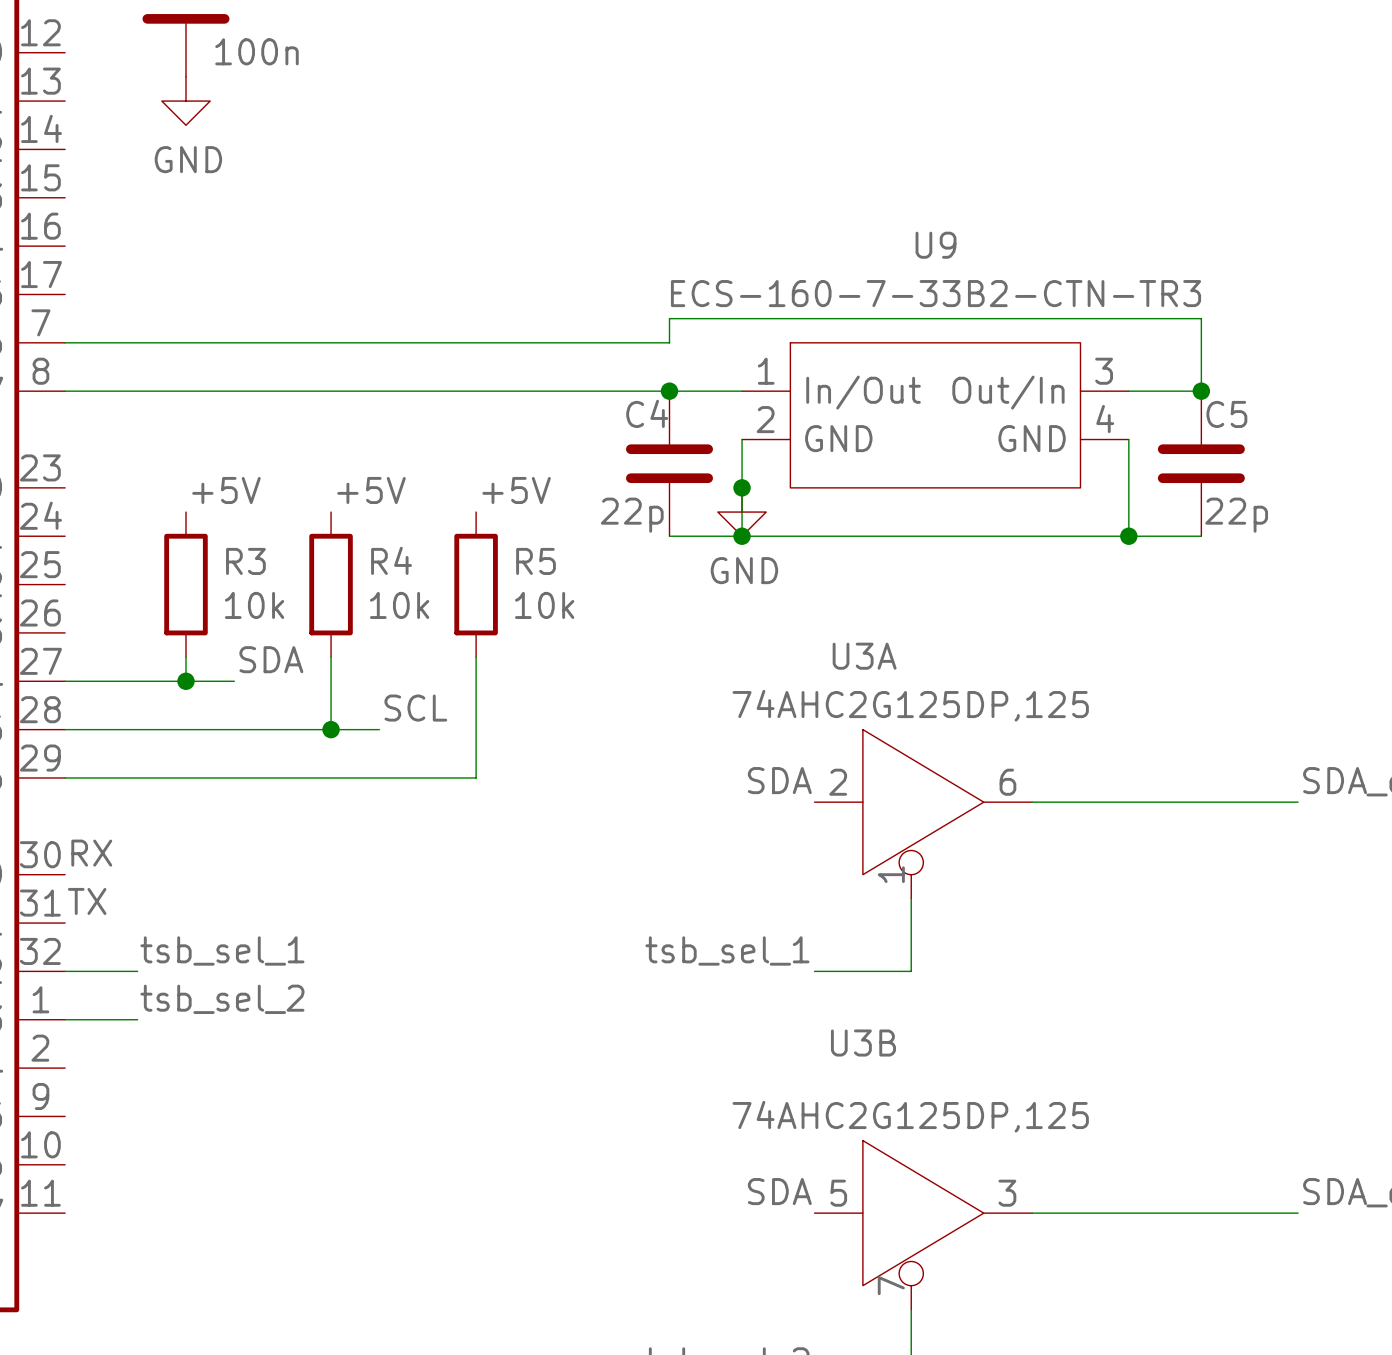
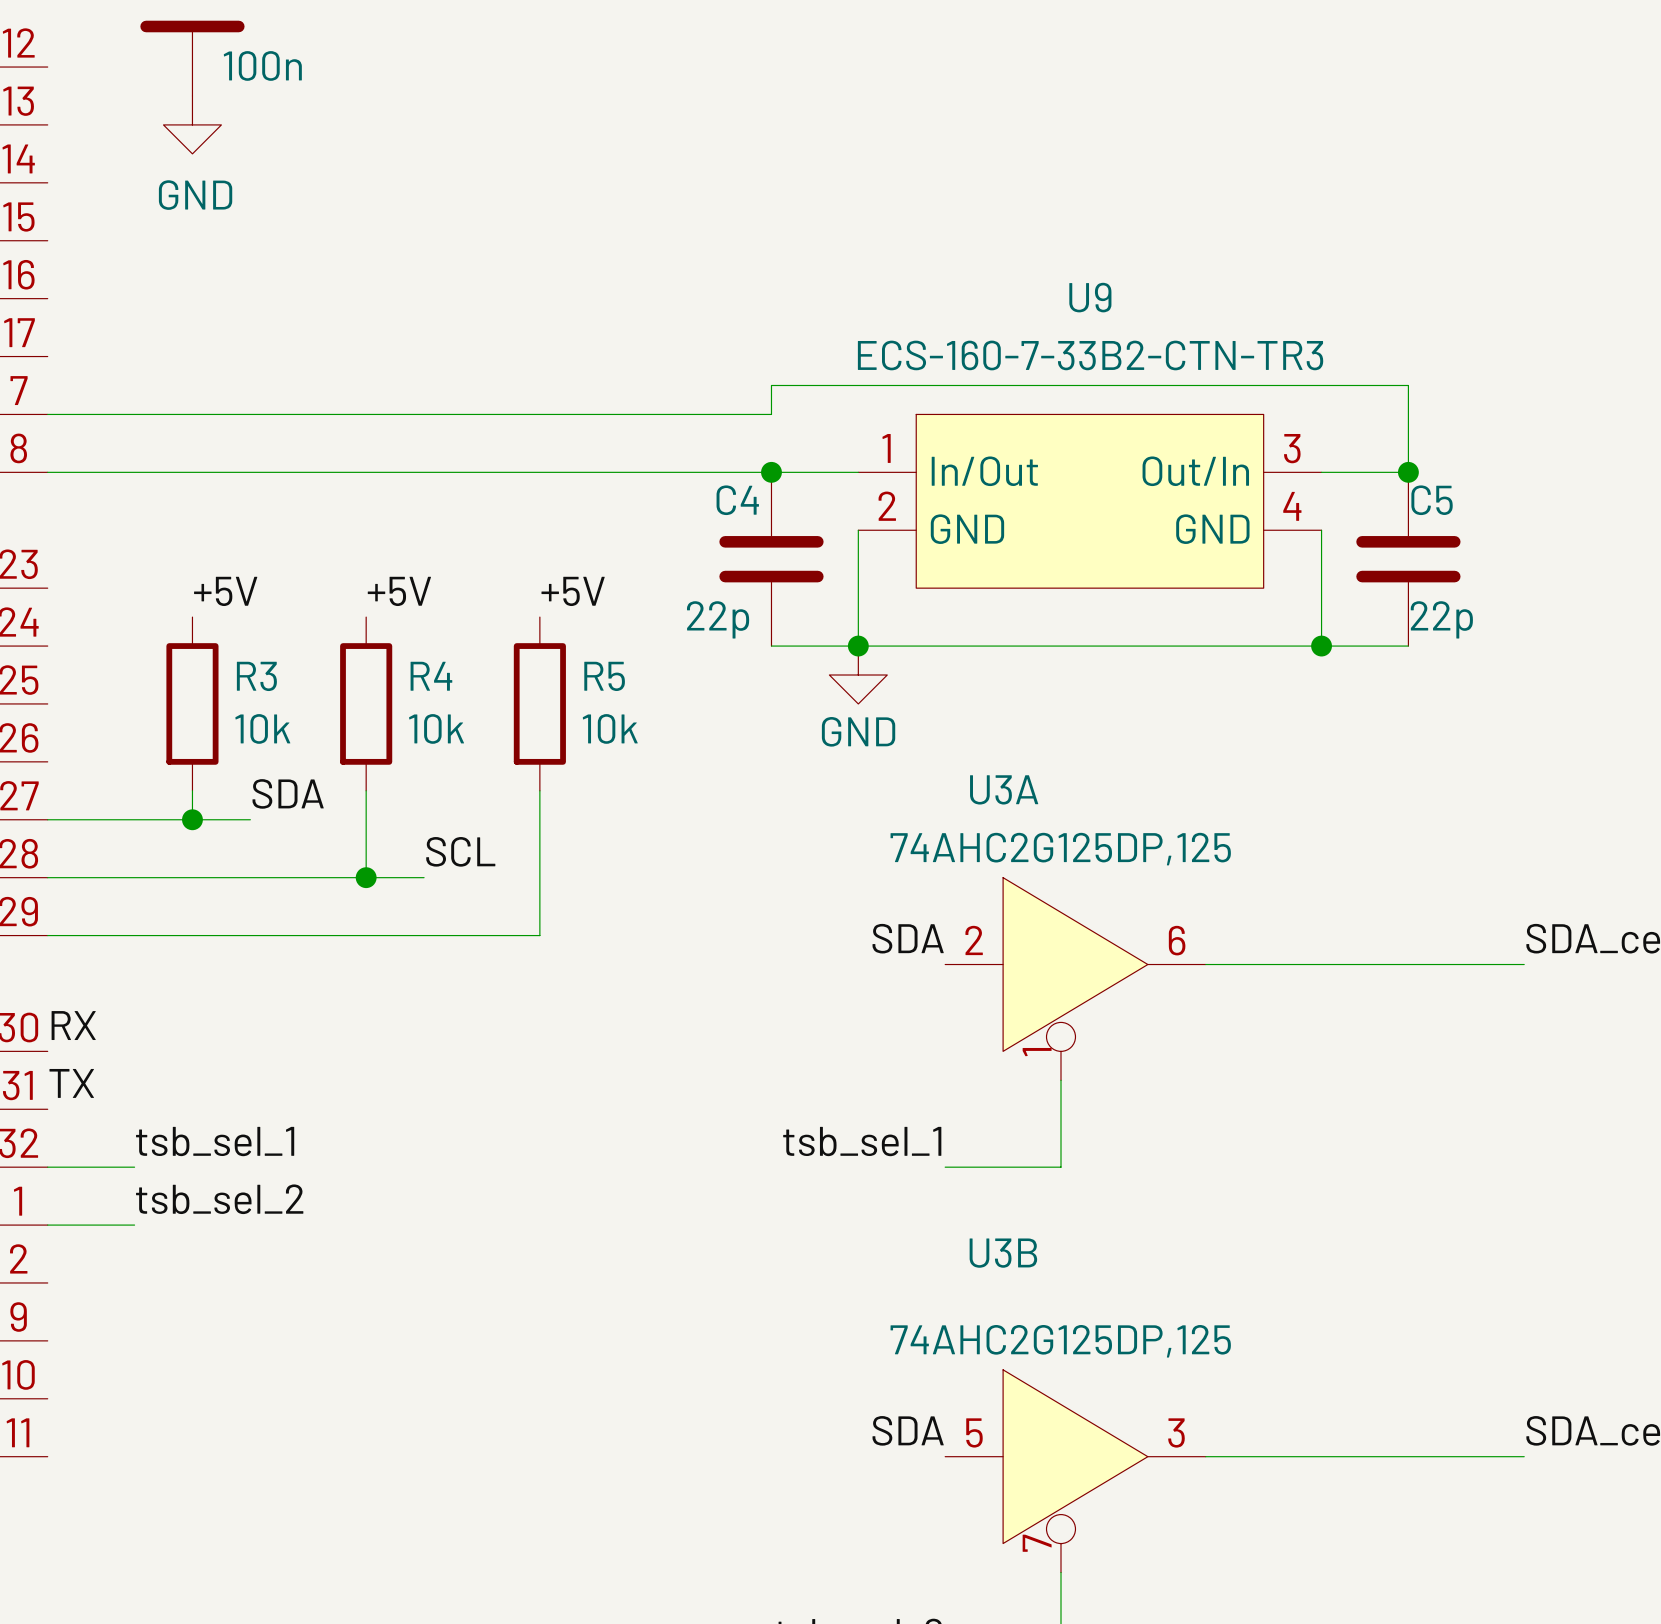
junction: (742, 487) -> none
power symbol position: GND (742, 512) -> GND (858, 675)
power symbol text position: GND (744, 570) -> GND (858, 731)

